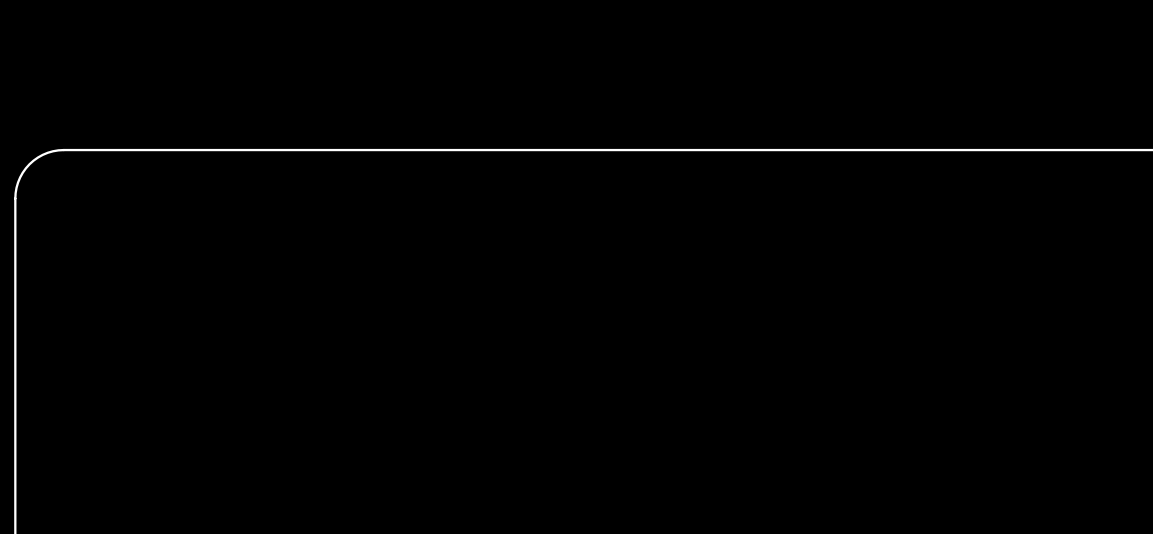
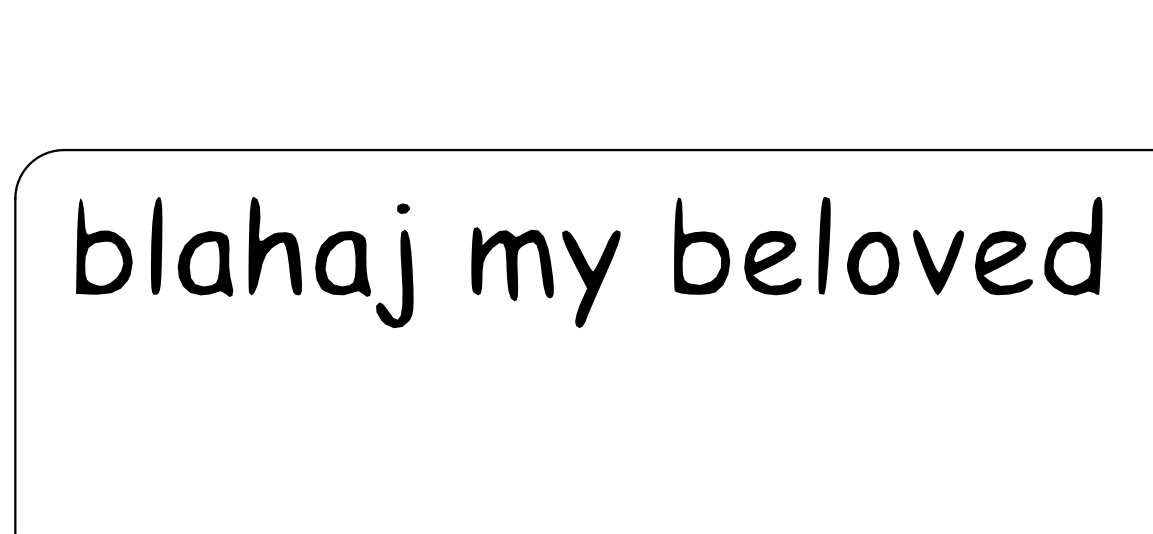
drawing: none -> [76, 196, 1103, 329]

